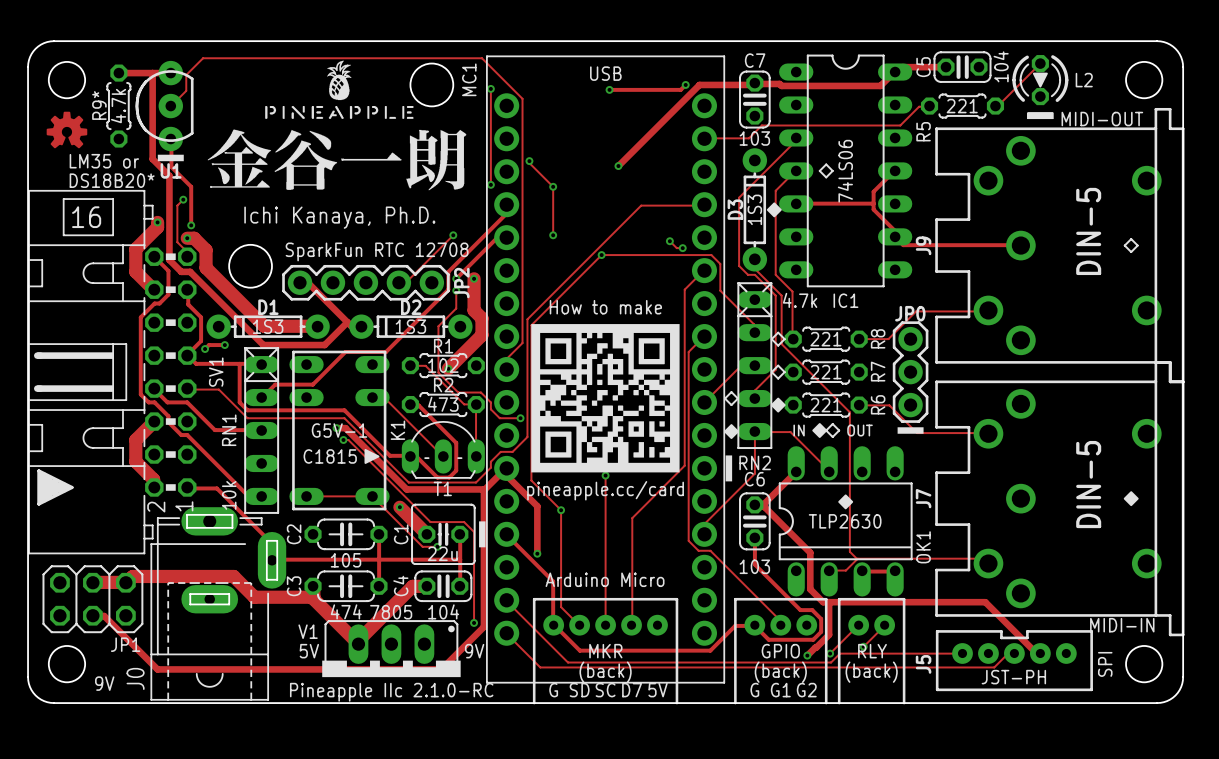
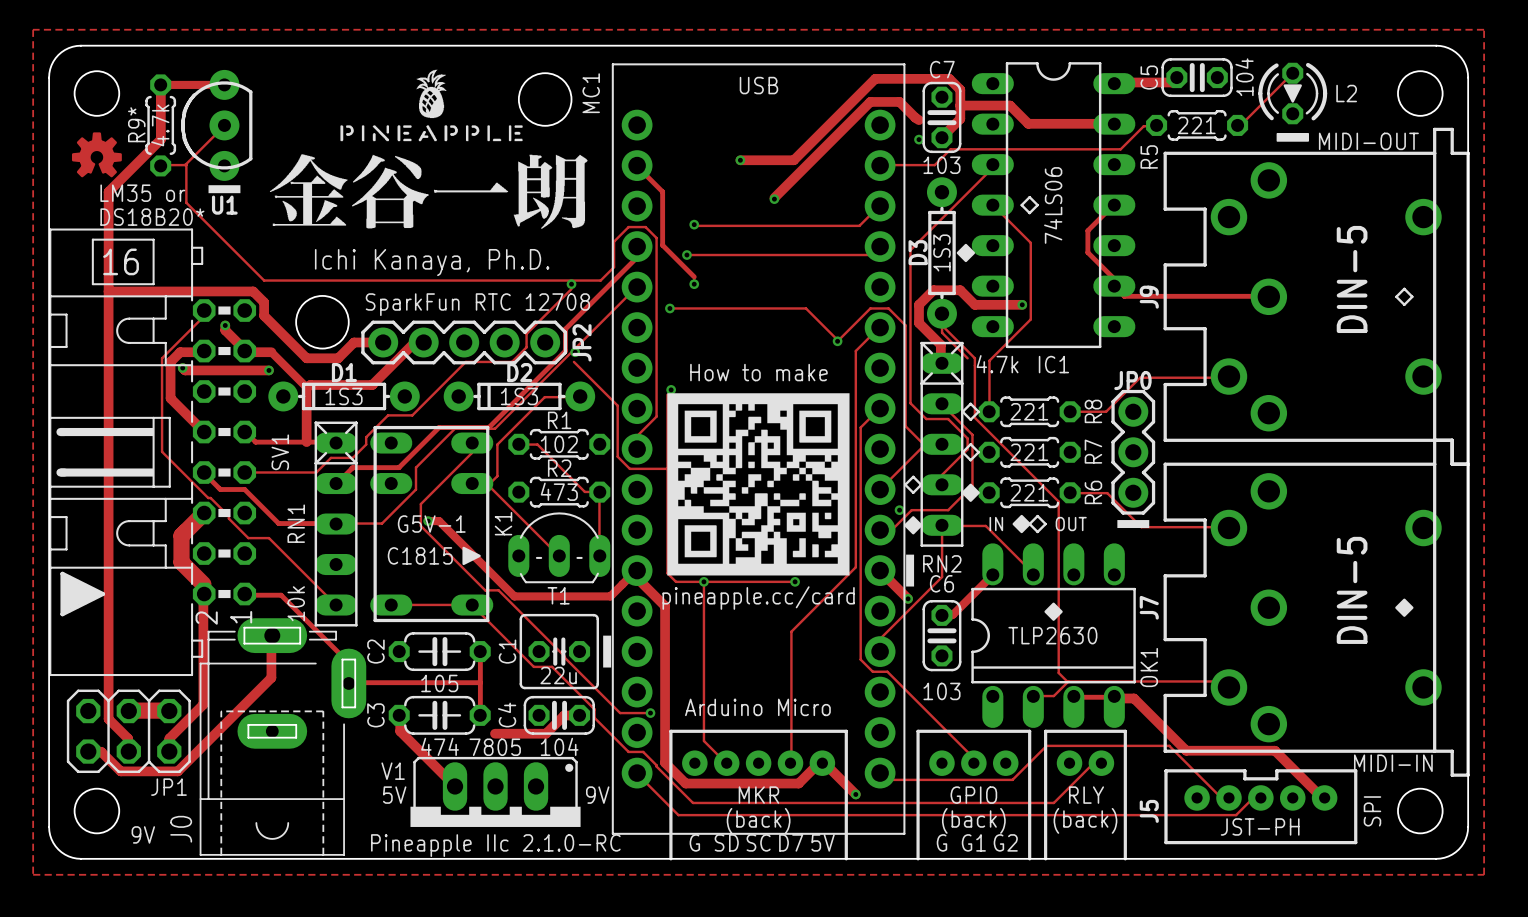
zone outline: none -> (33, 29) (1484, 29) (1484, 874) (33, 874) (33, 29)
track: (945, 67) (902, 67) (880, 85) (781, 85) (779, 83) (754, 83) (751, 84) (699, 84) (618, 166) -> (1176, 77) (1171, 82) (1114, 83)
track: (152, 73) (152, 159) (169, 175) (169, 260) (181, 271) (190, 271) (209, 290) -> none
track: (685, 84) (680, 89) (609, 89) -> none
via: (685, 84) -> none
track: (490, 88) (490, 184) -> none
via: (490, 88) -> none
via: (609, 89) -> none
track: none -> (960, 105) (1010, 105) (1028, 123) (1114, 124)
track: none -> (919, 120) (899, 101) (870, 101) (774, 197)
track: (170, 106) (186, 90) (186, 75) (203, 58) (481, 58) (522, 98) (522, 197) -> (185, 164) (186, 202) (264, 280) (600, 280) (614, 267) (614, 241) (628, 227) (645, 227) (656, 238)
track: none -> (224, 125) (185, 165) (160, 165)
track: none -> (941, 137) (960, 118) (960, 89) (949, 78) (875, 78) (793, 160) (740, 160)
via: none -> (919, 139)
via: none -> (740, 160)
track: (170, 139) (171, 167) (191, 186) (191, 225) -> none
track: (529, 161) (553, 186) (553, 229) -> (637, 165) (662, 191) (662, 245) (694, 276)
via: (529, 161) -> none
track: (796, 170) (775, 190) (775, 274) (792, 291) (793, 339) -> (993, 205) (1030, 242) (1030, 319) (989, 360) (989, 411)
track: none -> (880, 206) (859, 225) (693, 225)
via: (490, 184) -> none
track: (739, 197) (739, 265) (748, 274) (754, 274) -> (942, 325) (942, 332)
track: (183, 199) (177, 205) (177, 242) (187, 252) (187, 256) -> none
via: (183, 199) -> none
track: (873, 203) (796, 203) -> none
track: (703, 205) (641, 205) (527, 319) (527, 437) (512, 451) (500, 451) (490, 461) (490, 467) (476, 482) (408, 482) (344, 418) (247, 418) (218, 389) (187, 388) -> (571, 289) (526, 333) (526, 347) (511, 361) (465, 361) (412, 415) (388, 415) (366, 437) (366, 444) (352, 457) (330, 457) (316, 472) (244, 472)
track: none -> (878, 247) (871, 255) (686, 255)
via: none -> (686, 255)
track: (157, 222) (157, 227) (135, 249) (135, 271) (154, 289) -> (204, 432) (170, 398) (170, 361) (180, 352) (204, 351)
via: (157, 222) -> none
via: (191, 225) -> none
track: (453, 235) (405, 282) (398, 282) -> none
track: (187, 238) (194, 238) (206, 250) (206, 267) (264, 326) (317, 326) -> none
via: (187, 238) -> none
track: (505, 238) (496, 238) (456, 278) -> (635, 287) (494, 428) (454, 428) (416, 467) (416, 489) (381, 523) (335, 523)
track: (669, 241) (676, 248) (682, 248) -> none
via: (669, 241) -> none
via: (682, 248) -> none
track: none -> (1022, 304) (974, 304) (960, 290) (933, 290) (919, 304) (919, 323) (940, 344) (941, 363)
via: none -> (1022, 304)
via: none -> (669, 308)
track: (601, 255) (531, 325) -> (753, 308) (669, 308)
via: (601, 255) -> none
track: (644, 255) (696, 255) -> (806, 308) (837, 341) (870, 308)
track: (154, 256) (168, 270) (168, 294) (159, 303) (154, 303) (140, 317) (140, 394) (148, 402) (154, 402) (168, 416) (168, 422) (181, 435) (187, 435) (248, 496) (261, 496) -> (204, 310) (203, 316) (162, 358) (162, 451) (208, 498) (210, 498) (248, 538) (268, 538) (335, 604)
track: (720, 263) (720, 290) (753, 324) (754, 332) -> (899, 319) (905, 325) (905, 426) (923, 444) (941, 444)
track: none -> (225, 325) (225, 330) (244, 351)
via: none -> (225, 325)
via: (456, 278) -> none
track: (474, 278) (474, 310) (481, 318) (481, 335) (448, 368) -> none
via: (474, 278) -> none
via: none -> (837, 341)
track: (300, 282) (307, 282) (351, 326) (361, 326) -> (383, 342) (354, 342) (338, 358) (306, 358) (264, 315) (264, 302) (253, 291) (108, 291)
track: none -> (423, 342) (414, 342) (372, 385) (310, 385) (306, 387) (306, 442)
track: (188, 290) (188, 304) (201, 317) (201, 341) (187, 355) -> (245, 352) (271, 352)
track: (456, 290) (456, 308) (438, 326) (438, 372) (458, 392) (480, 392) (490, 402) (490, 409) (499, 418) (520, 418) -> none
track: (775, 295) (775, 360) -> (922, 238) (910, 250) (910, 403) (926, 419) (948, 419) (967, 438)
track: none -> (573, 361) (617, 405) (617, 456) (629, 468) (667, 468)
track: none -> (182, 368) (185, 370) (268, 370)
via: none -> (182, 368)
via: none -> (268, 370)
track: (237, 319) (263, 345) (324, 345) (347, 322) -> none
via: none -> (671, 389)
track: none -> (580, 396) (544, 397) (497, 444) (497, 476) (488, 484) (472, 483)
track: none -> (941, 403) (972, 434) (972, 485) (948, 510) (911, 510) (892, 529) (880, 530)
track: (224, 345) (209, 345) (205, 349) -> none
via: (224, 345) -> none
via: (205, 349) -> none
track: (239, 363) (239, 402) (247, 410) (344, 410) (389, 455) (416, 456) (437, 477) (449, 477) (456, 470) (456, 442) (418, 405) (410, 404) -> none
track: none -> (472, 443) (471, 453) (420, 504) (420, 525) (485, 590) (498, 590) (620, 713) (650, 713)
via: (448, 368) -> none
via: (520, 418) -> none
via: none -> (899, 510)
track: (343, 440) (348, 440) (430, 522) (464, 522) (474, 531) (474, 622) -> none
via: (343, 440) -> none
track: (506, 468) (504, 473) (537, 506) (537, 553) -> (637, 570) (635, 576) (665, 606) (665, 762) (685, 783) (798, 783) (818, 764) (822, 763) (855, 794)
track: none -> (880, 570) (908, 598)
track: (531, 470) (531, 480) (561, 510) -> (703, 581) (703, 621)
track: none -> (667, 573) (676, 581) (795, 581)
track: (605, 475) (605, 624) -> none
via: (605, 475) -> none
via: none -> (703, 581)
via: none -> (795, 581)
track: none -> (204, 594) (203, 704) (169, 738) (169, 751)
track: (483, 489) (483, 626) (441, 669) (157, 669) (104, 616) (92, 615) -> (160, 84) (160, 139) (108, 191) (108, 719) (128, 738) (128, 751)
via: none -> (908, 598)
track: (763, 504) (810, 552) (810, 589) (823, 602) (985, 602) (1035, 652) (1040, 653) -> none
track: (399, 507) (426, 534) -> none
via: (399, 507) -> none
via: (561, 510) -> none
track: none -> (272, 635) (271, 677) (177, 771) (120, 771) (101, 751) (88, 751)
track: (459, 534) (459, 586) -> (494, 733) (546, 733) (564, 715) (579, 715)
track: (506, 534) (553, 581) (553, 624) (579, 650) (710, 650) (735, 625) (754, 625) (768, 639) (813, 639) (821, 631) (821, 619) (812, 610) (800, 610) (754, 564) (754, 537) -> none
via: (437, 546) -> none
via: (537, 553) -> none
track: (379, 559) (460, 559) -> none
track: none -> (1114, 696) (1118, 698) (1134, 698) (1186, 750) (1274, 750) (1321, 796) (1324, 797)
track: (125, 582) (132, 576) (233, 576) (254, 597) (313, 597) -> none
via: none -> (650, 713)
track width: thick (313, 586) (313, 599) (358, 644) -> thin (399, 715) (400, 731) (455, 786)
track: (426, 586) (412, 586) (361, 637) (358, 644) -> none
track: (506, 600) (568, 662) (831, 662) (839, 653) (962, 653) -> none
track: (829, 602) (829, 634) (807, 655) -> none
via: (474, 622) -> none
track: (858, 625) (830, 653) -> none
track: (884, 625) (863, 646) -> (1101, 764) (1092, 764) (1053, 802) (693, 802) (643, 751) (628, 751) (594, 717) (594, 709) (552, 666)
track: none -> (880, 773) (886, 779) (1012, 779) (1046, 745) (1169, 745) (1220, 796) (1228, 797)
via: (863, 646) -> none
via: none -> (855, 794)
via: (830, 653) -> none
via: (807, 655) -> none

